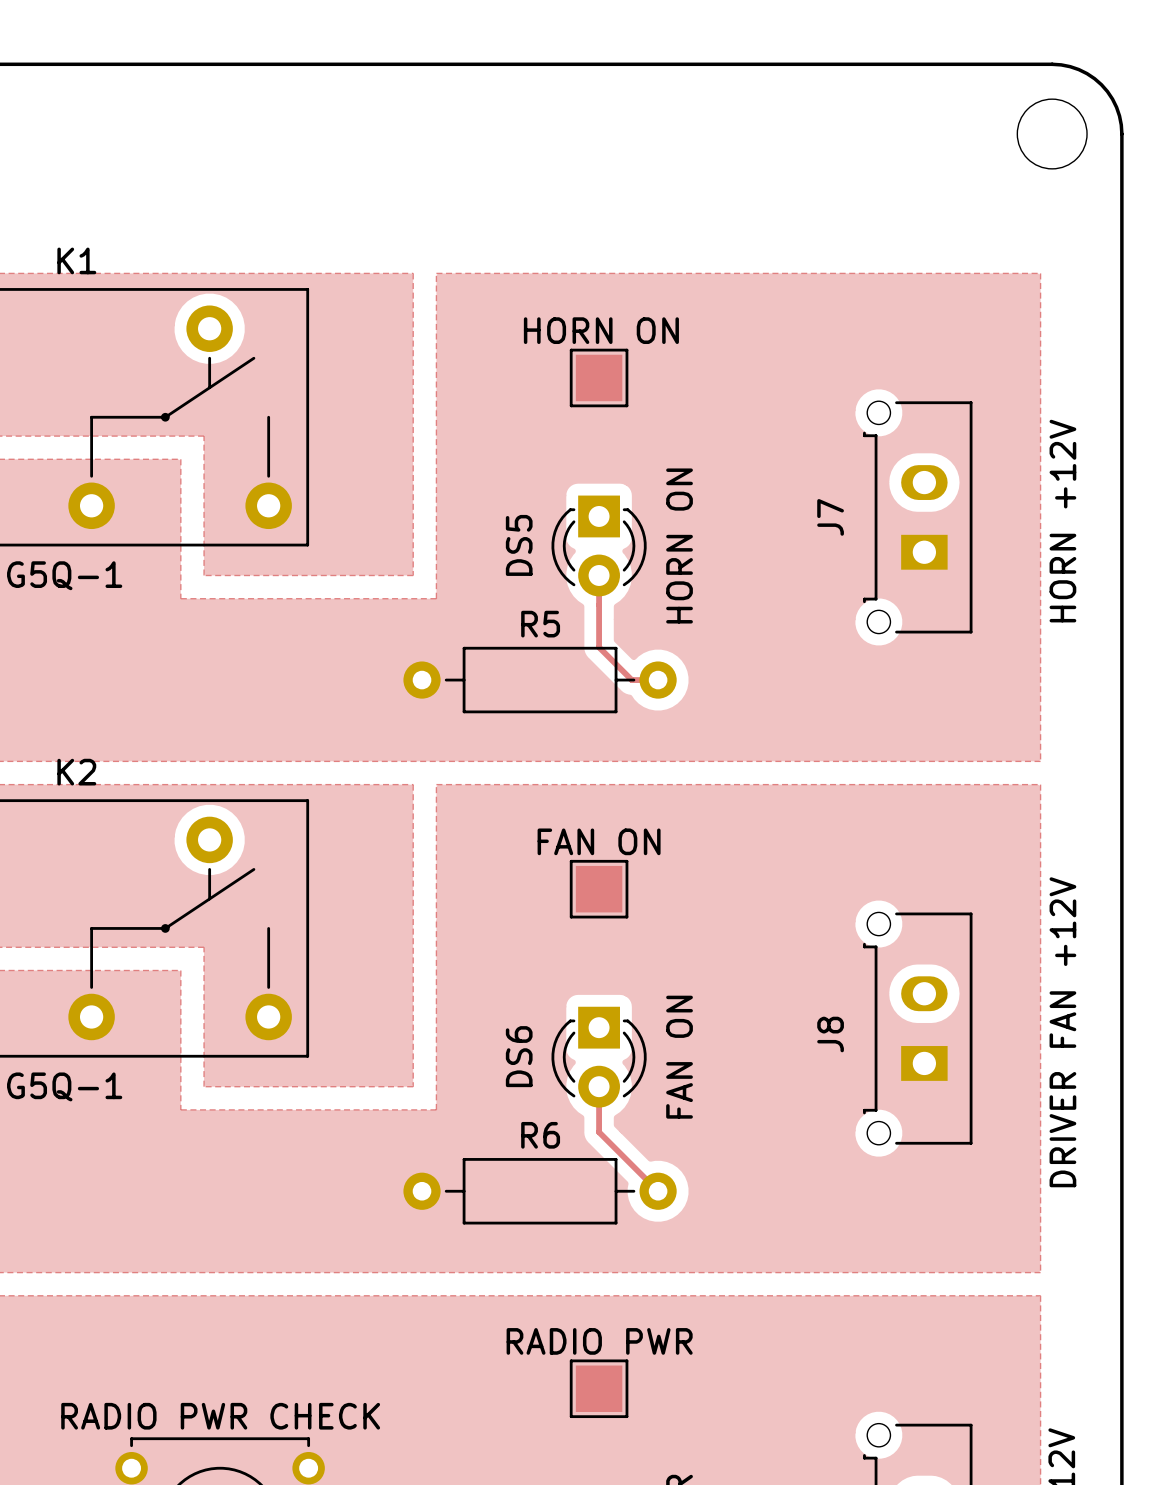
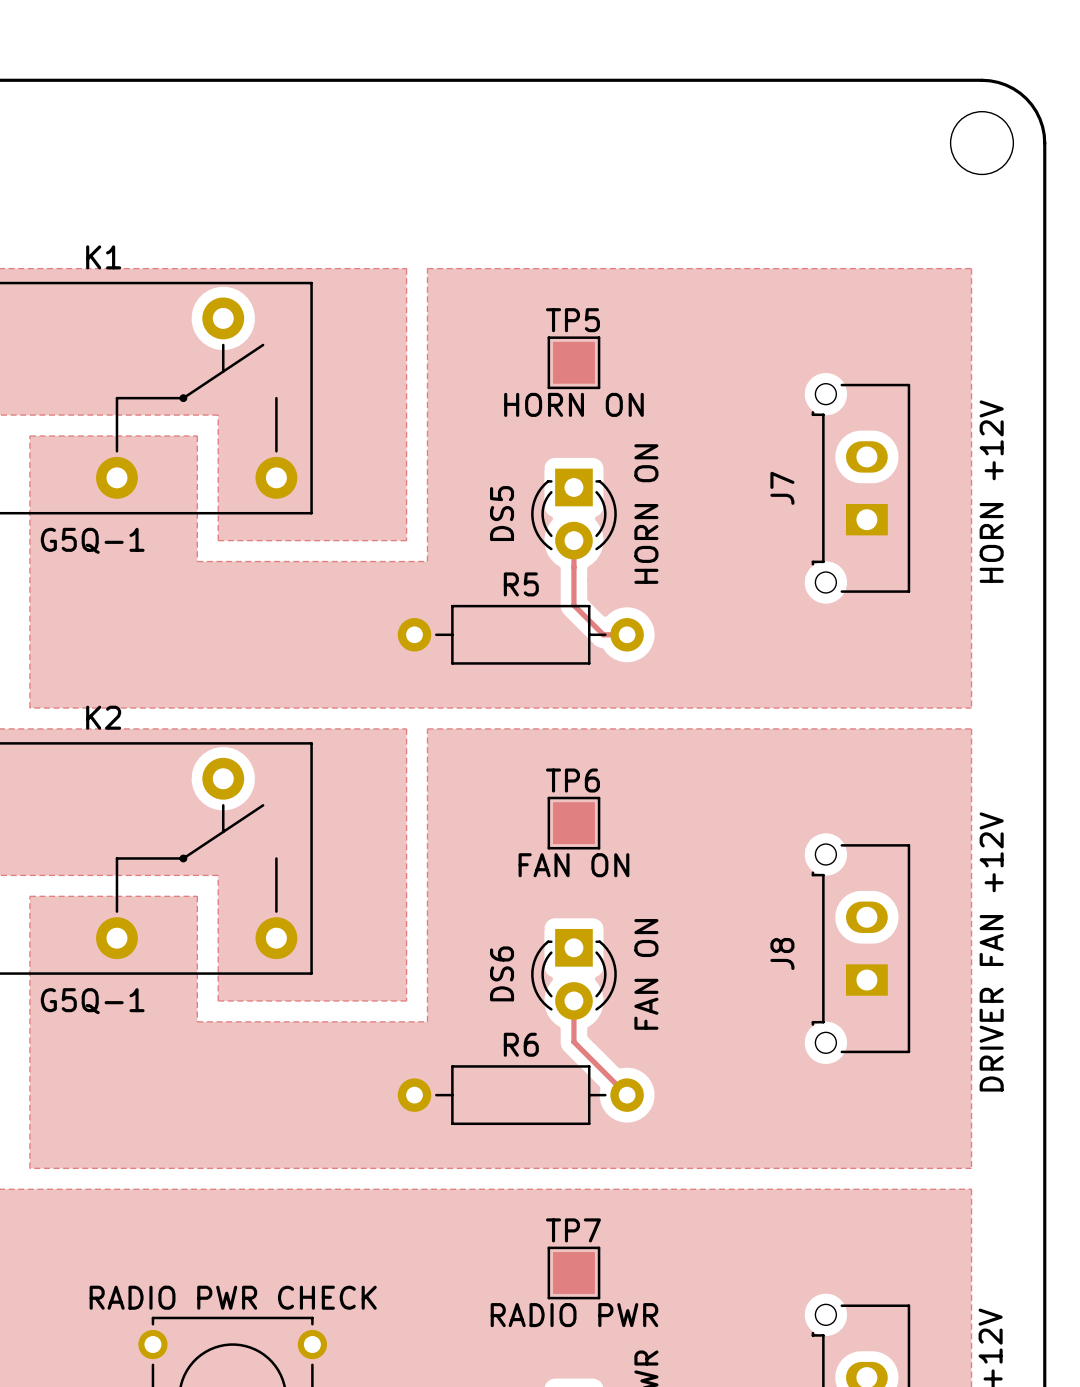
TP5 name: none -> TP5 (572, 320)
TP5 value position: HORN ON (601, 330) -> HORN ON (573, 404)
TP6 name: none -> TP6 (572, 780)
TP6 value position: FAN ON (599, 841) -> FAN ON (573, 865)
TP7 name: none -> TP7 (573, 1230)
TP7 value position: RADIO PWR (599, 1341) -> RADIO PWR (574, 1315)

